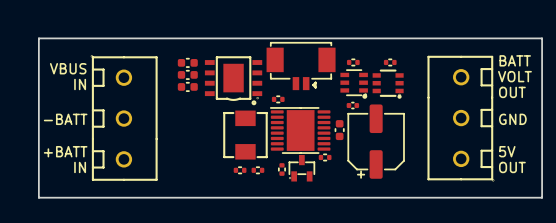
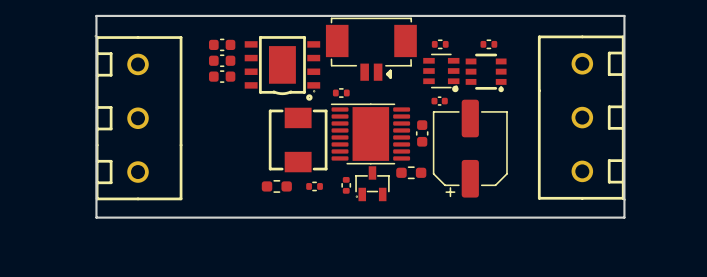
board edge: (38, 38) (542, 38) (542, 197) (38, 197) (38, 38) -> (96, 15) (96, 217) (624, 217) (624, 15) (96, 15)
text: BATT (515, 60) -> none
text: VBUS (68, 68) -> none
text: VOLT (514, 76) -> none
text: IN (80, 84) -> none
text: OUT (512, 92) -> none
text: -BATT (65, 119) -> none
text: GND (512, 119) -> none
text: +BATT (65, 151) -> none
text: 5V (507, 151) -> none
part footprint: [318, 153, 332, 162] -> [396, 166, 427, 180]
text: IN (80, 167) -> none
text: OUT (512, 167) -> none
part: none -> (276, 186)
part: (240, 170) -> none

